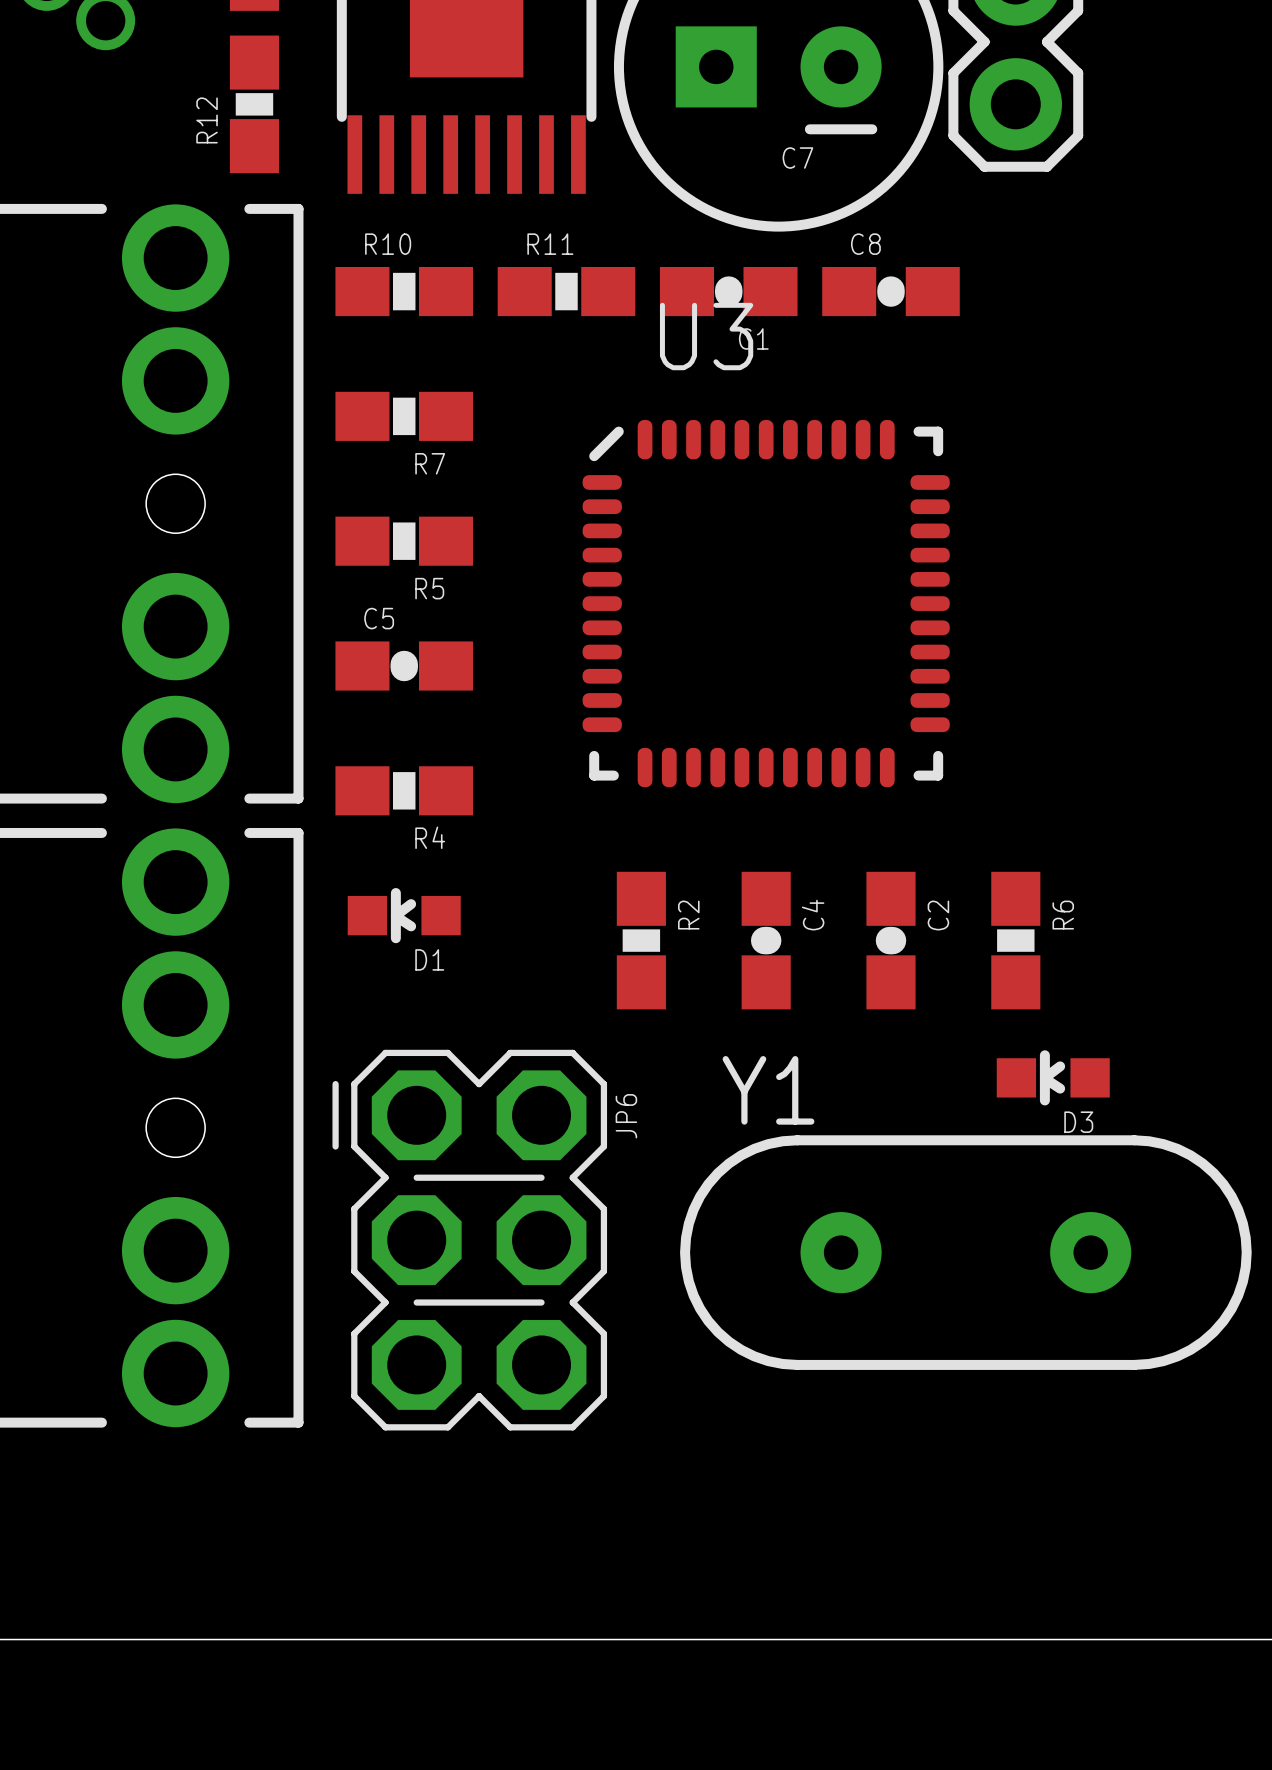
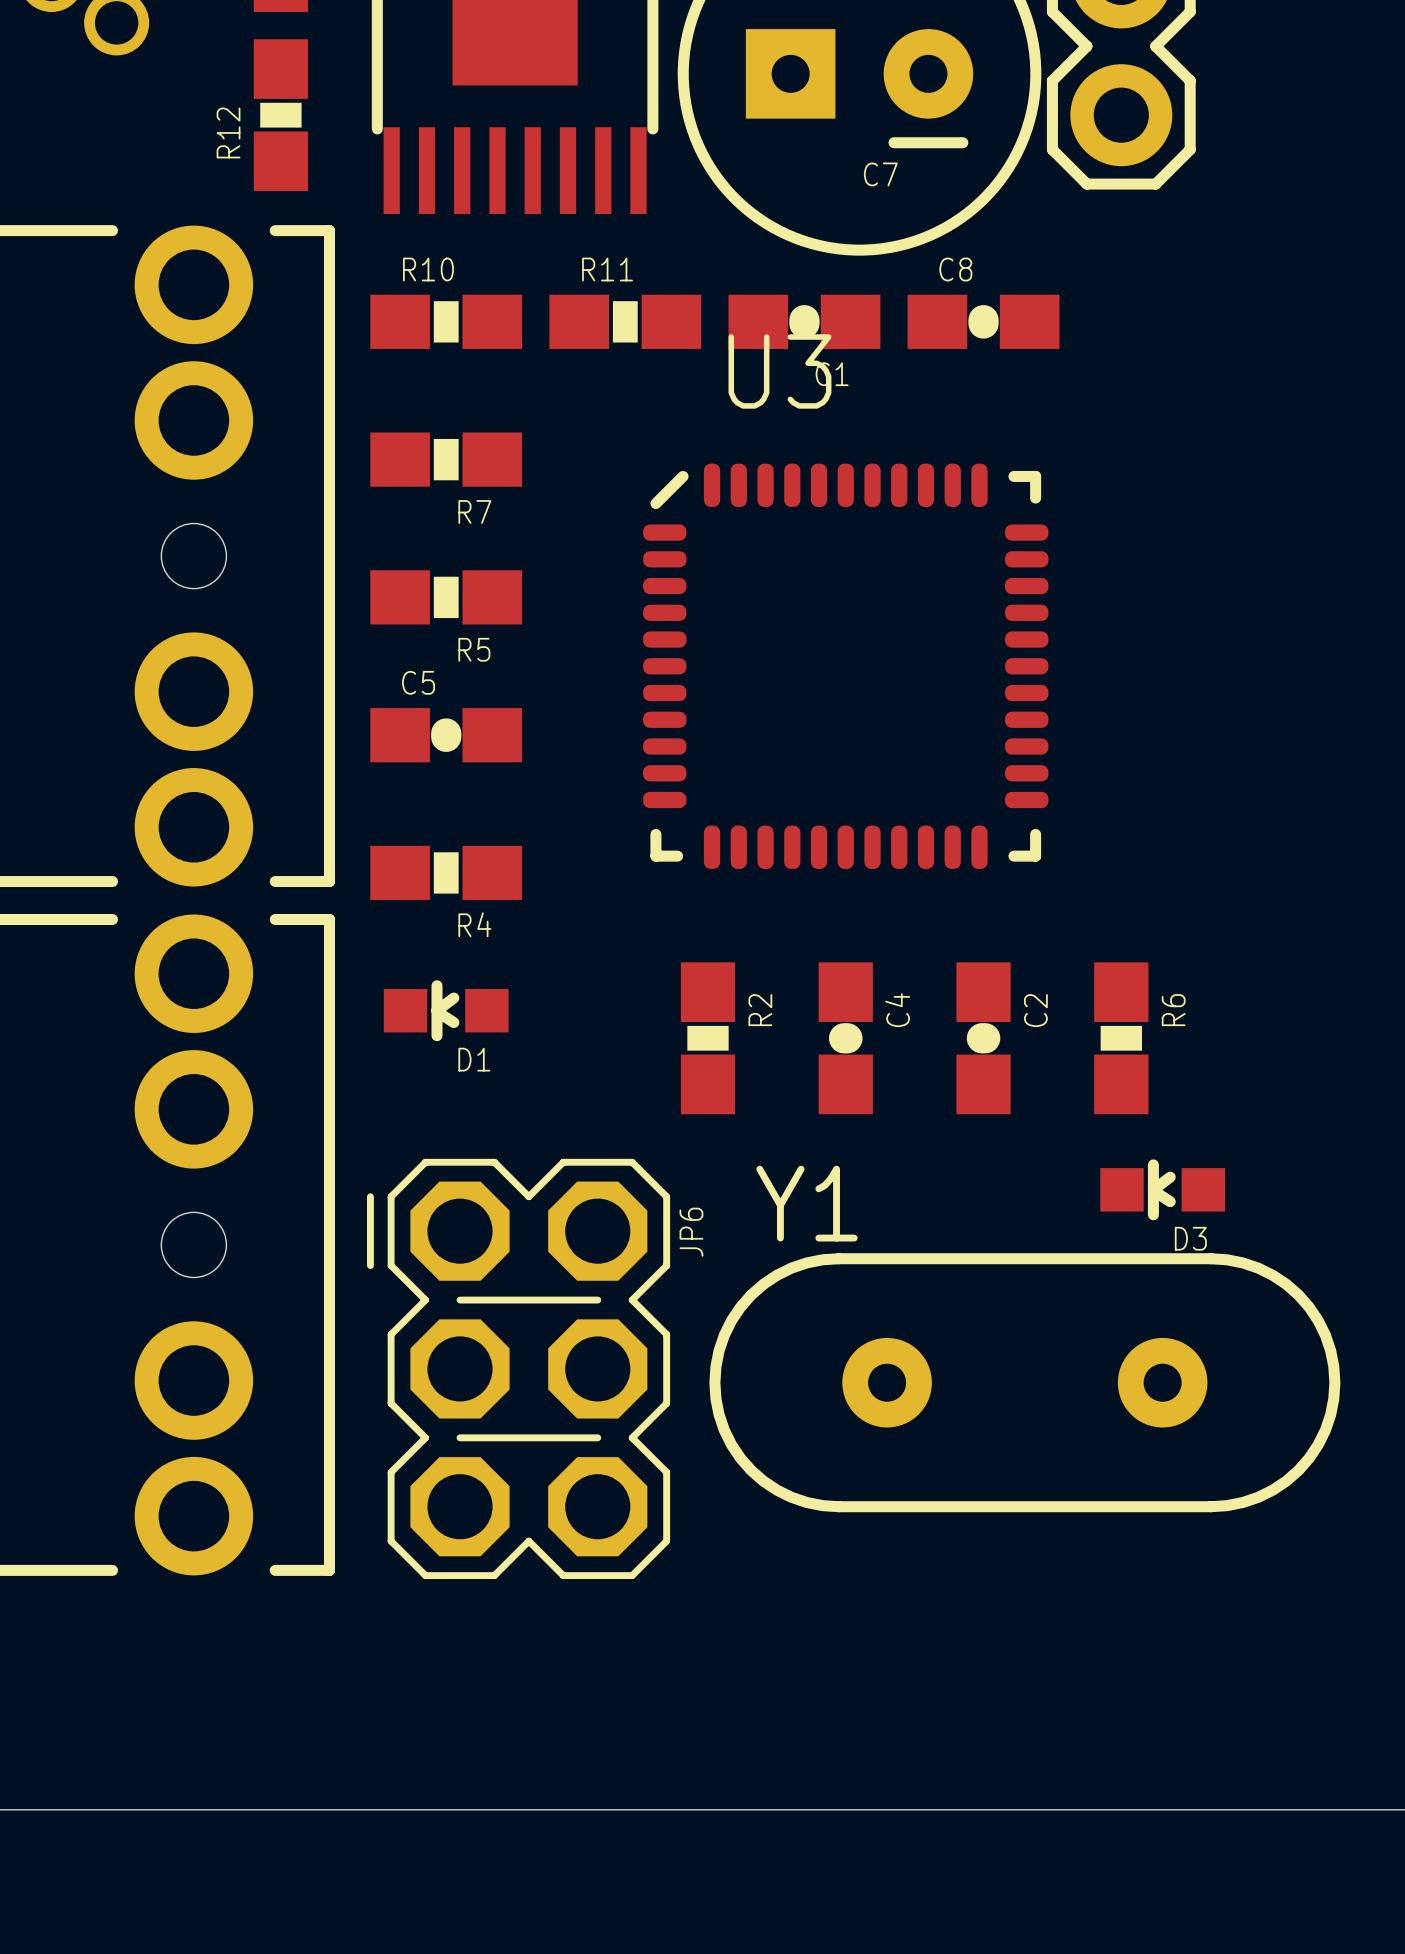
Y1 position: (965, 1252) -> (1024, 1382)

